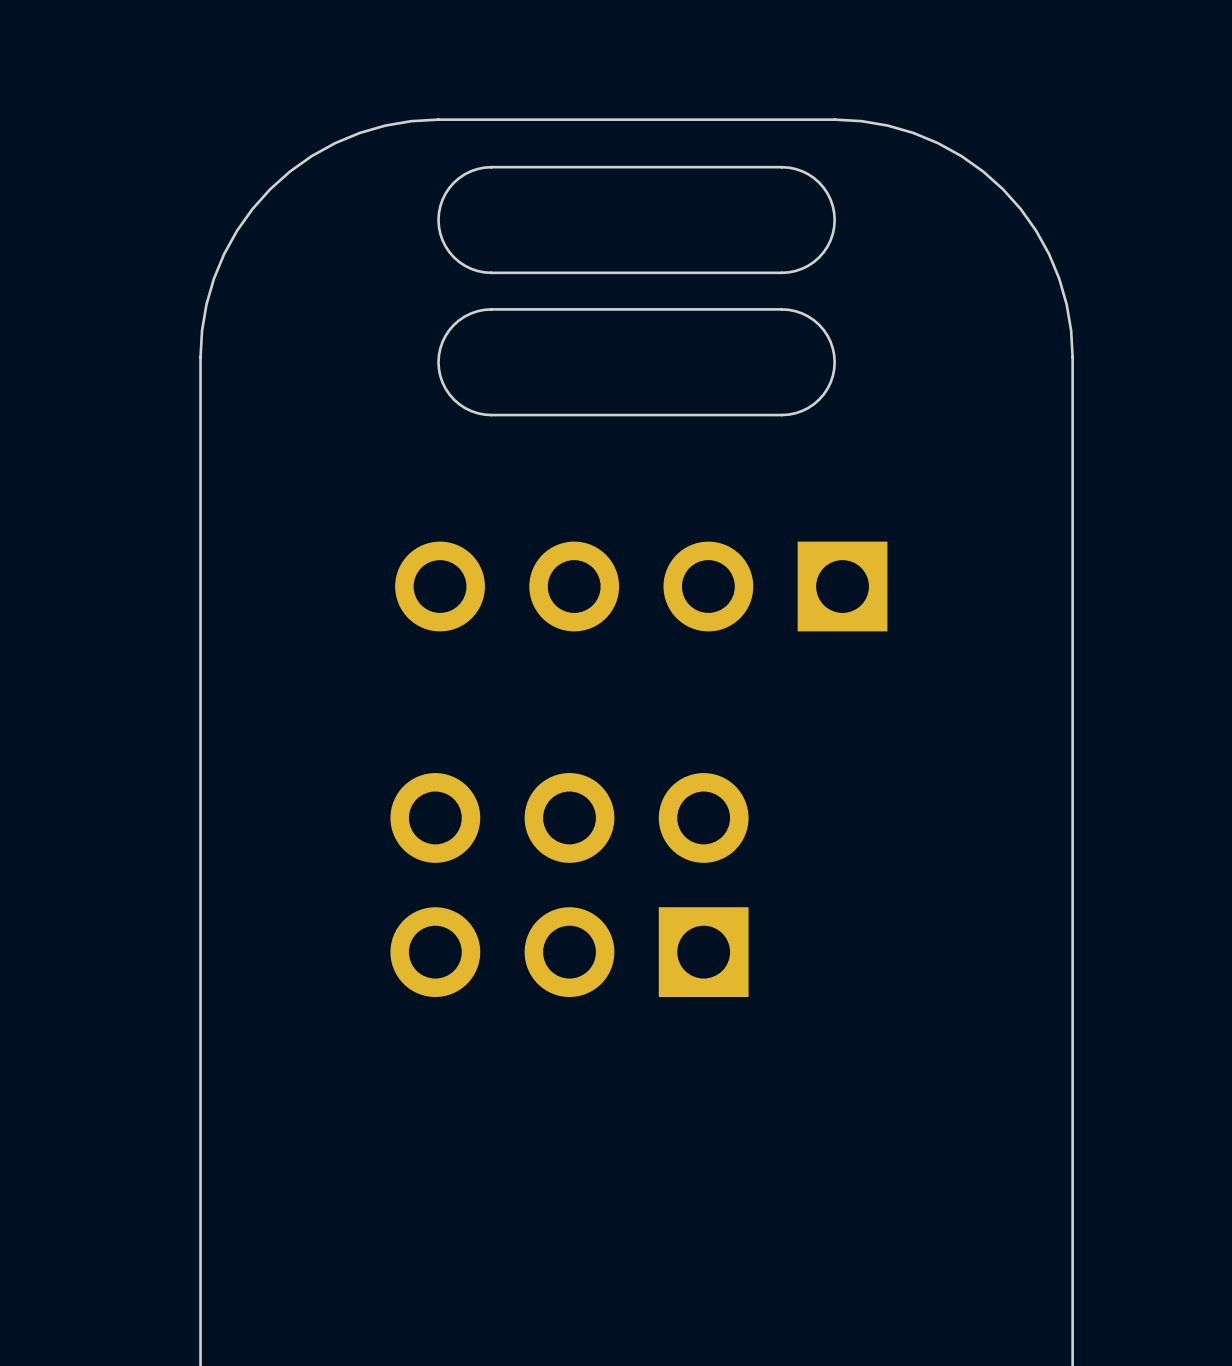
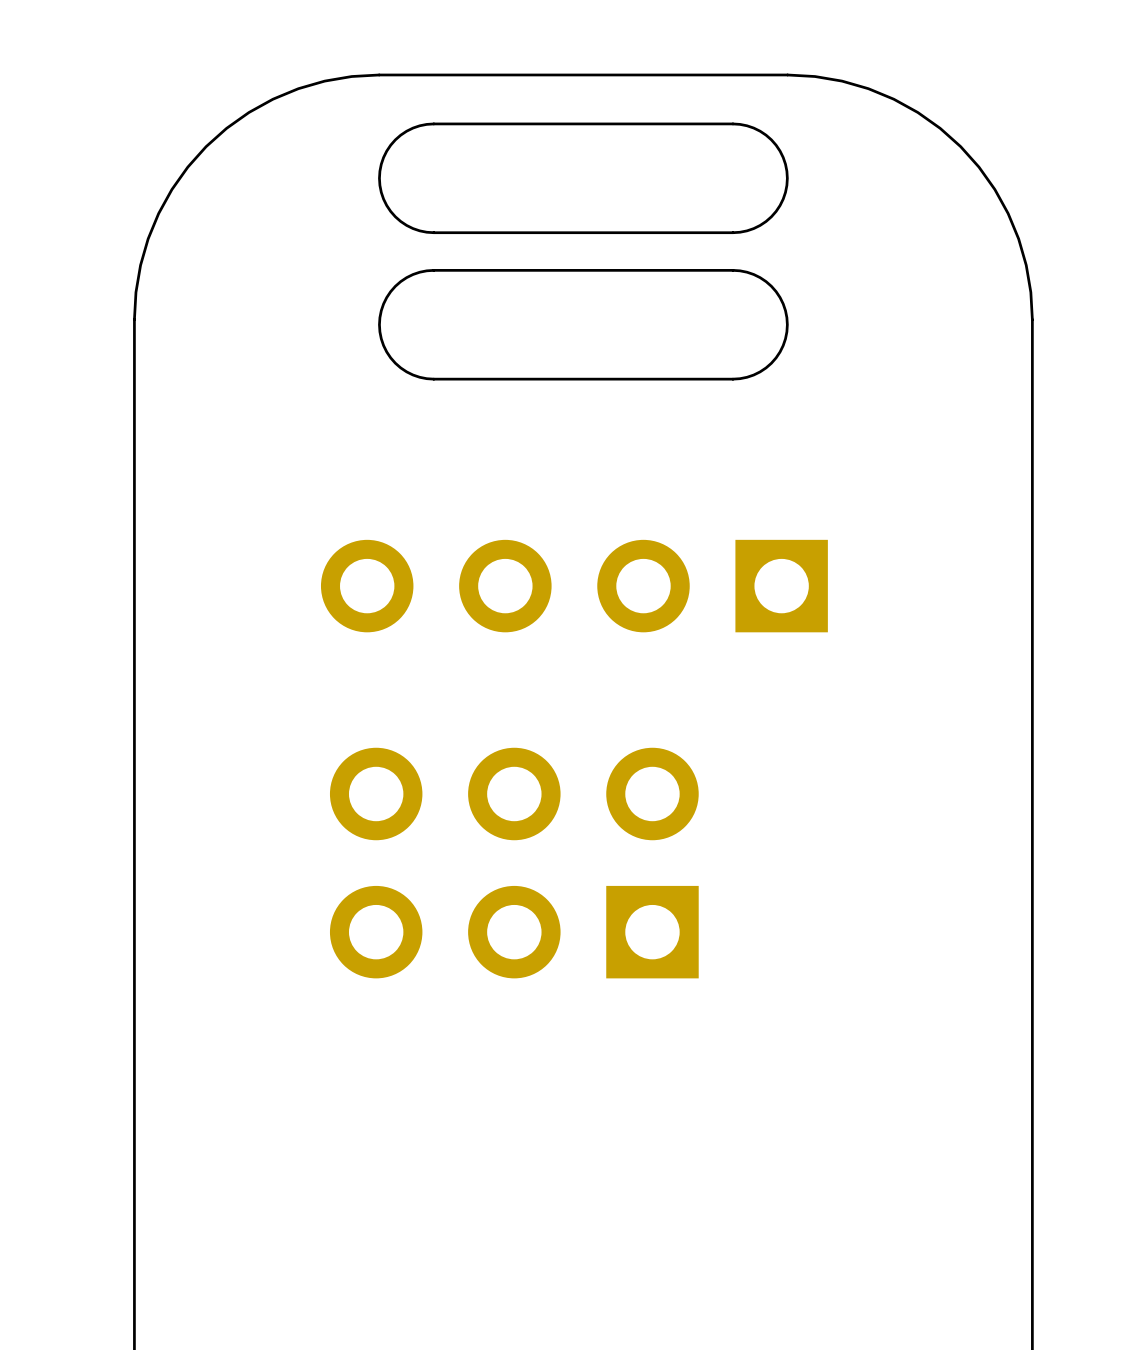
part position: (641, 586) -> (574, 586)

